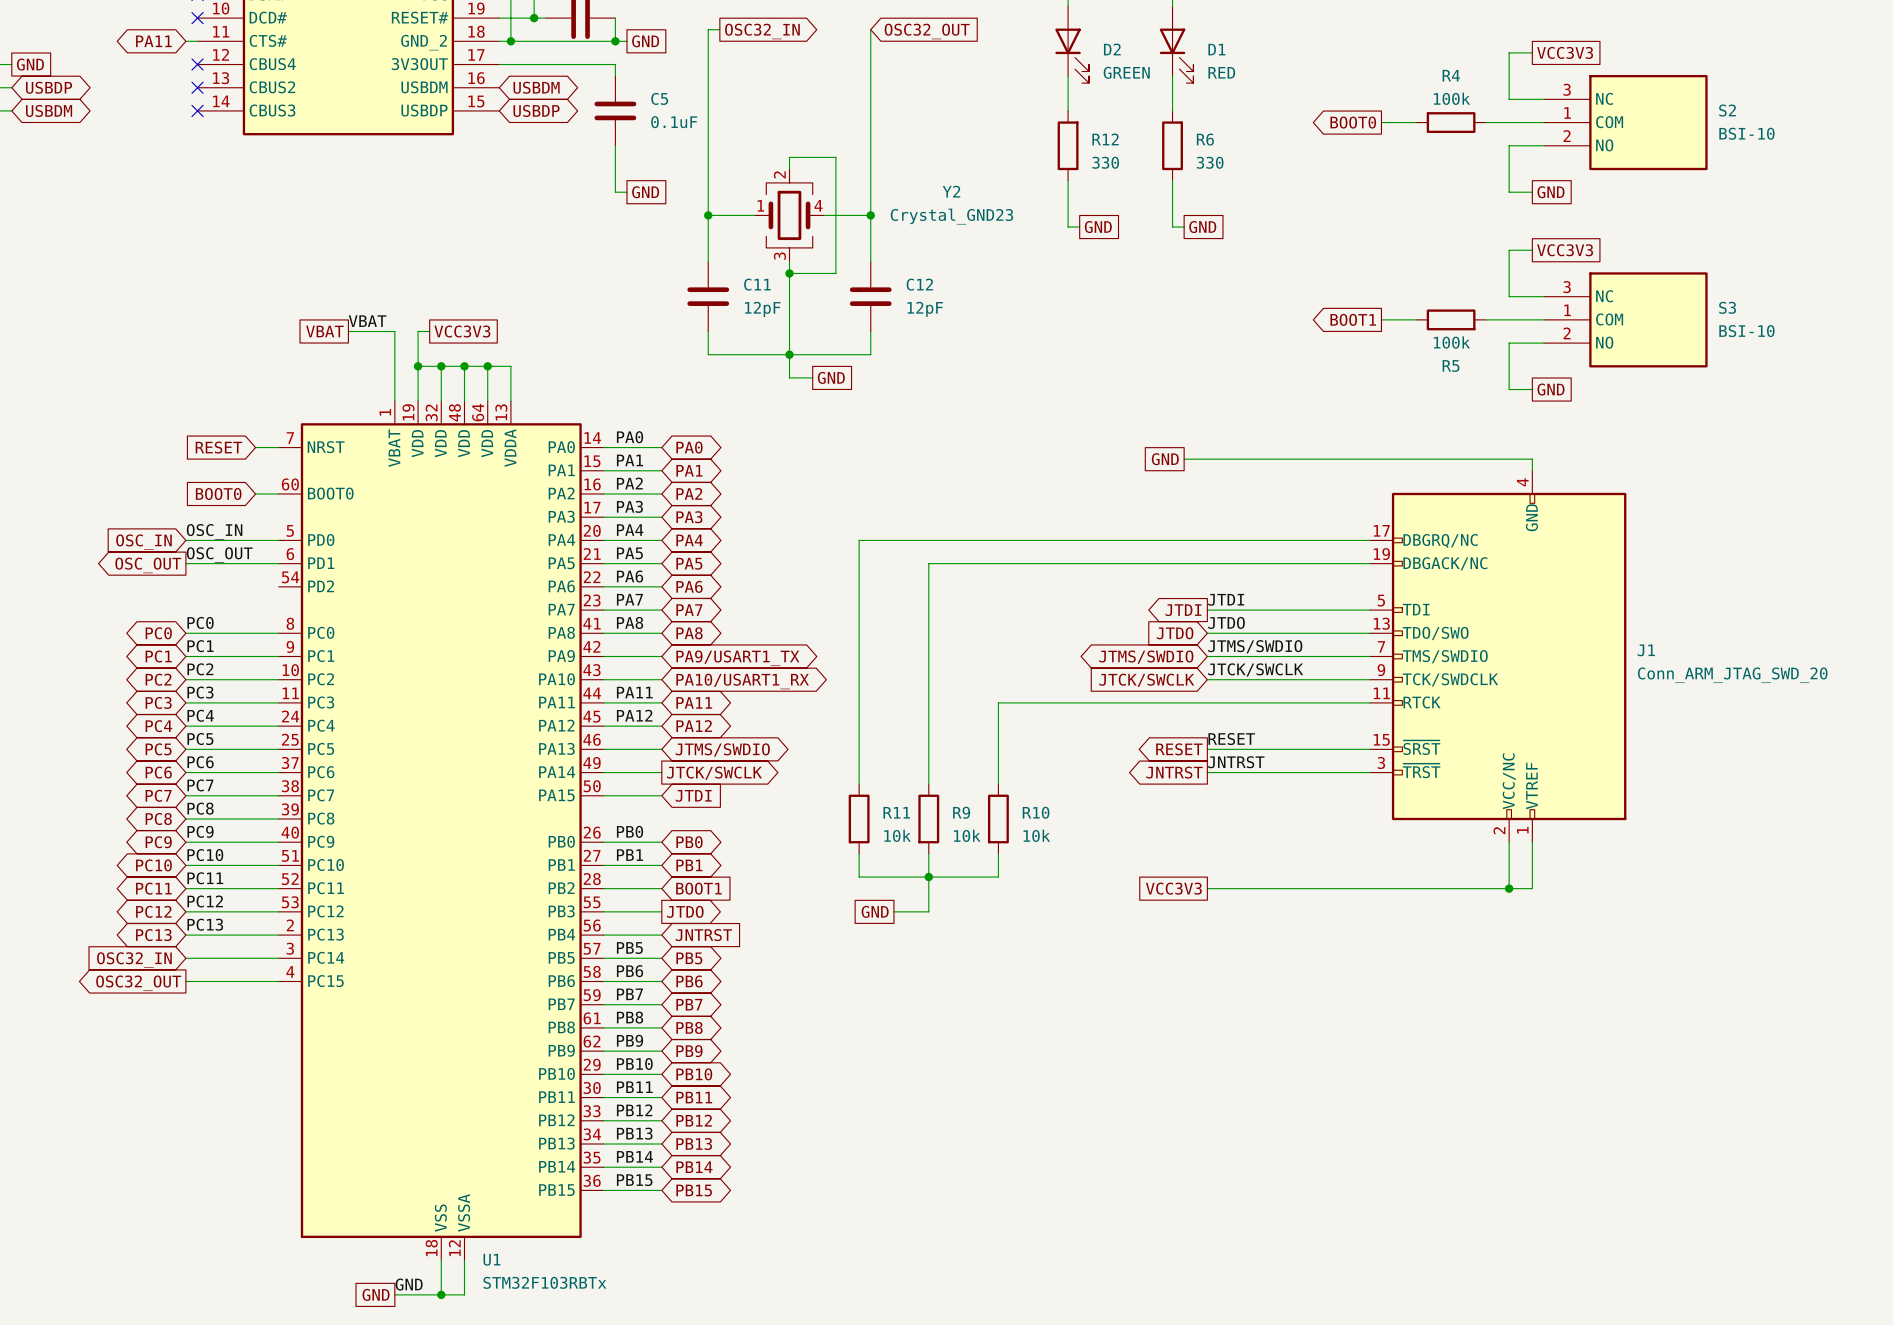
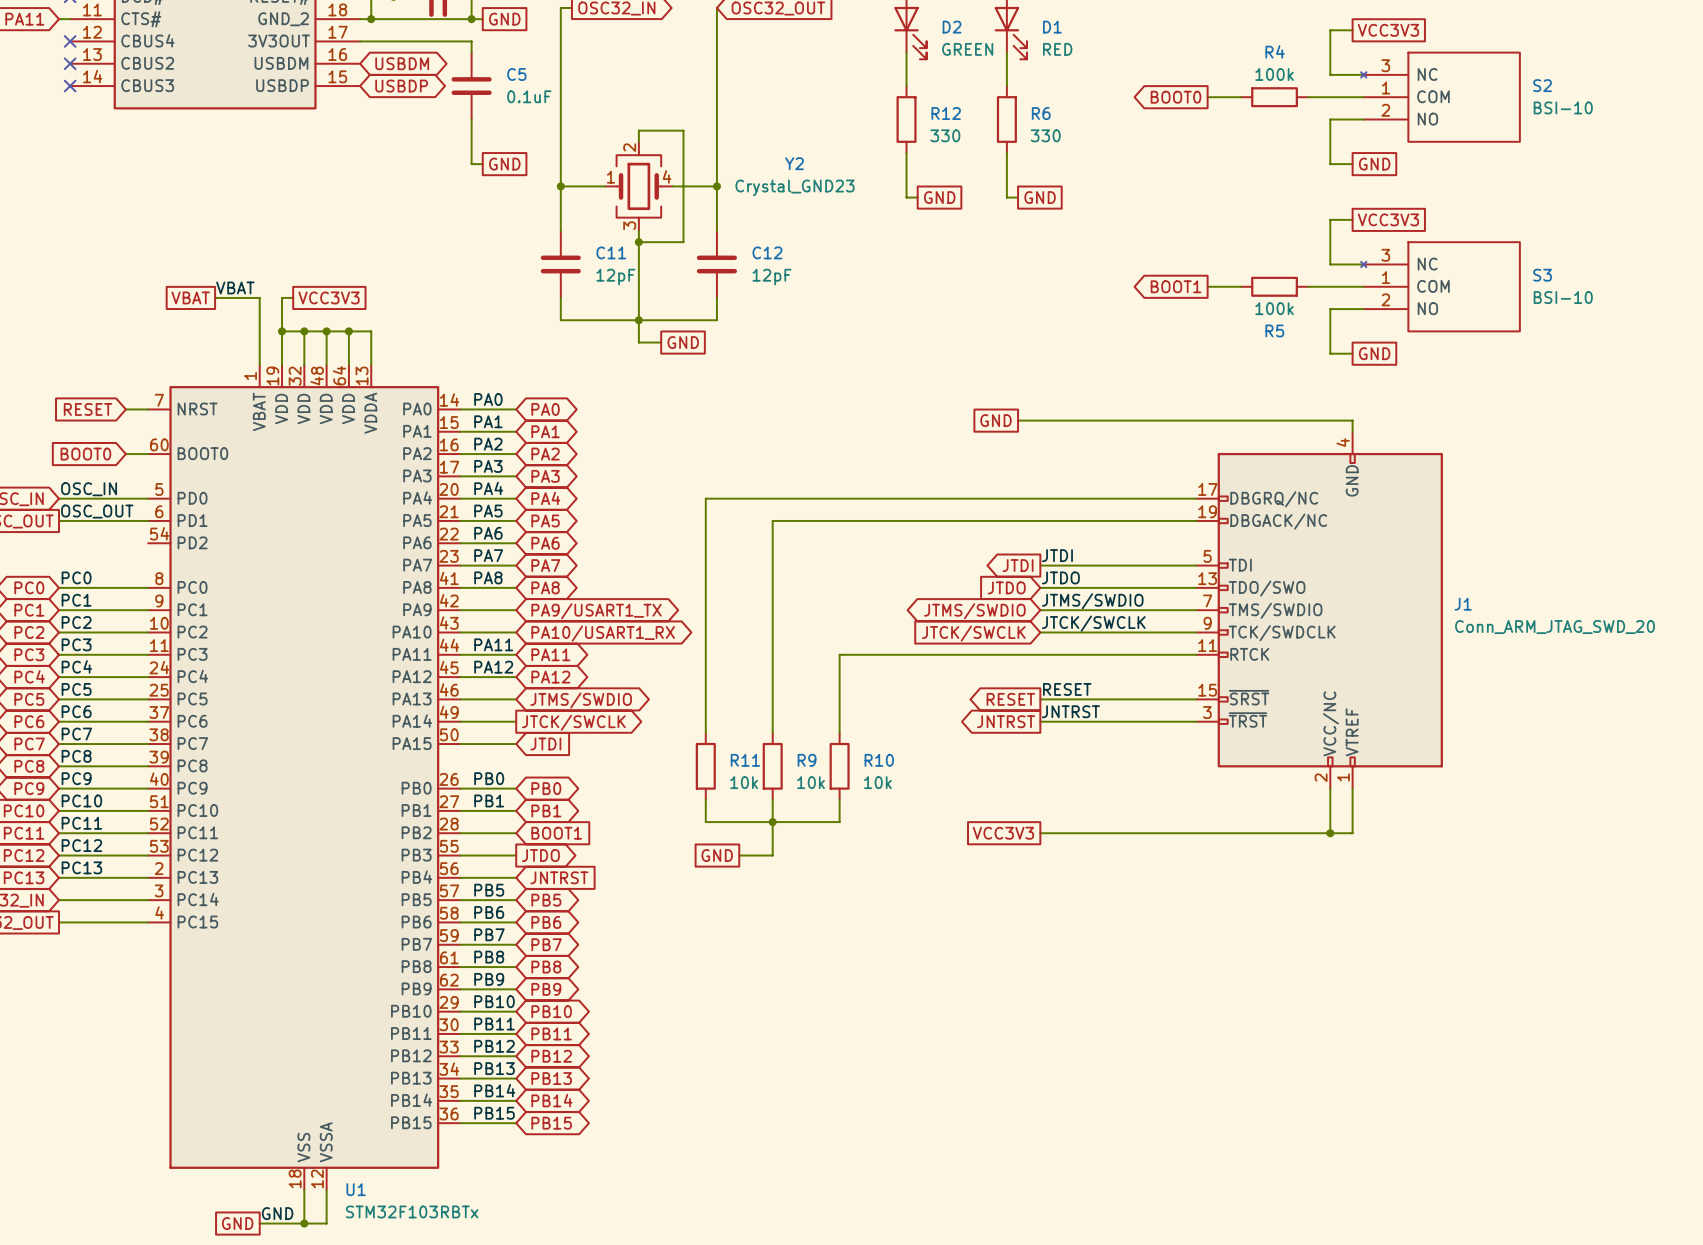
S2 symbol: [1543, 74, 1708, 171] -> [1361, 51, 1521, 143]
S3 symbol: [1543, 272, 1708, 368] -> [1361, 241, 1521, 333]

